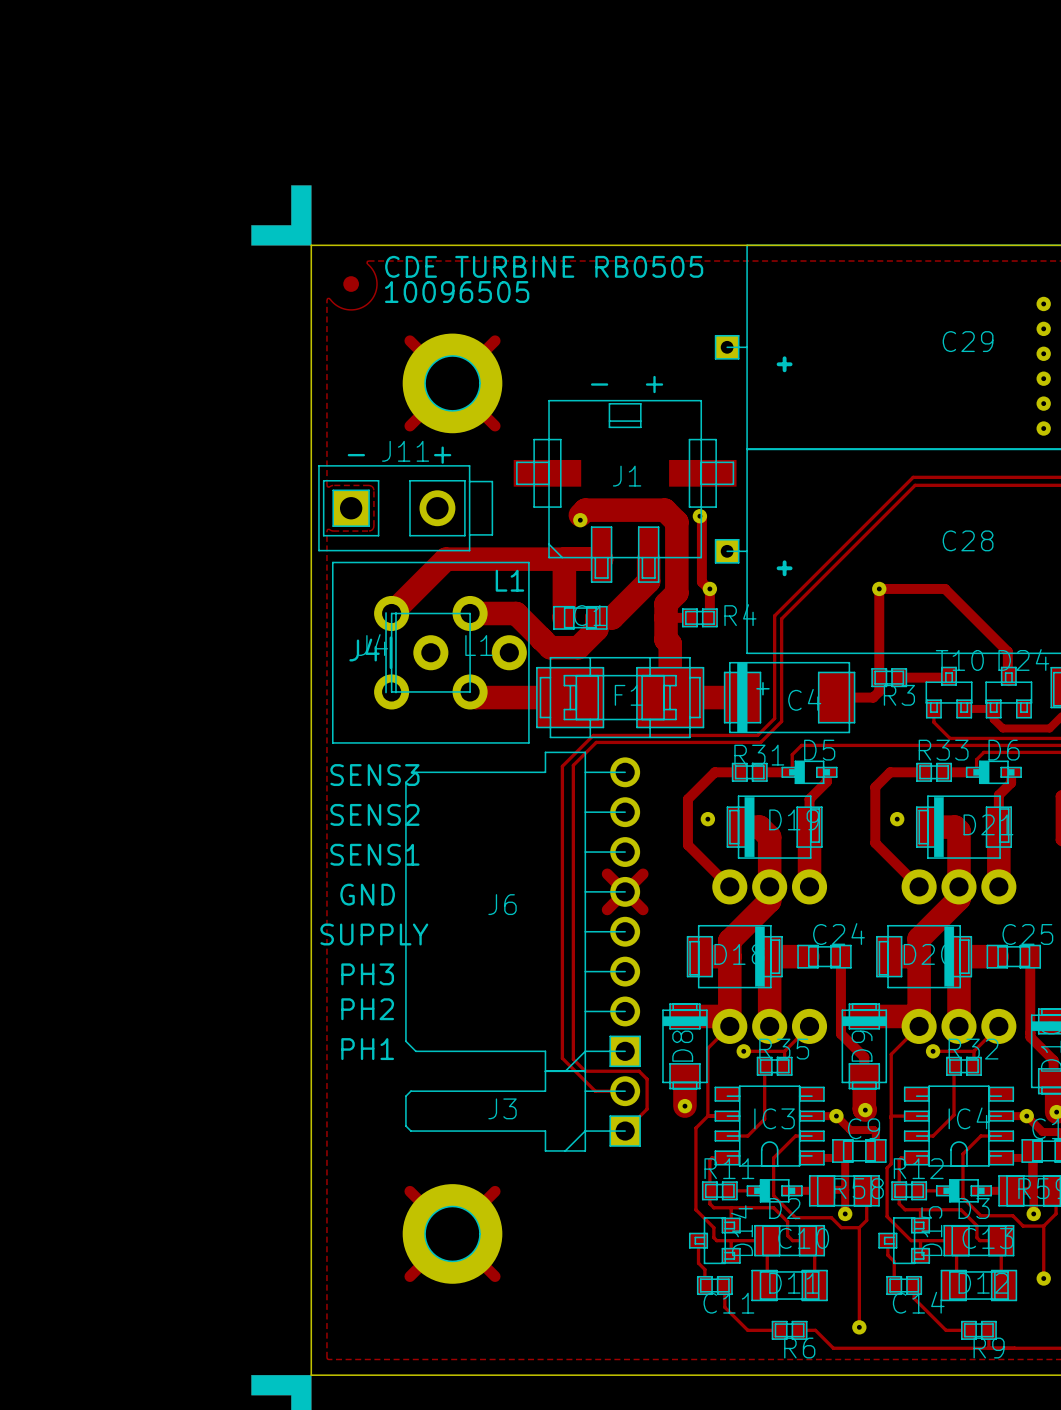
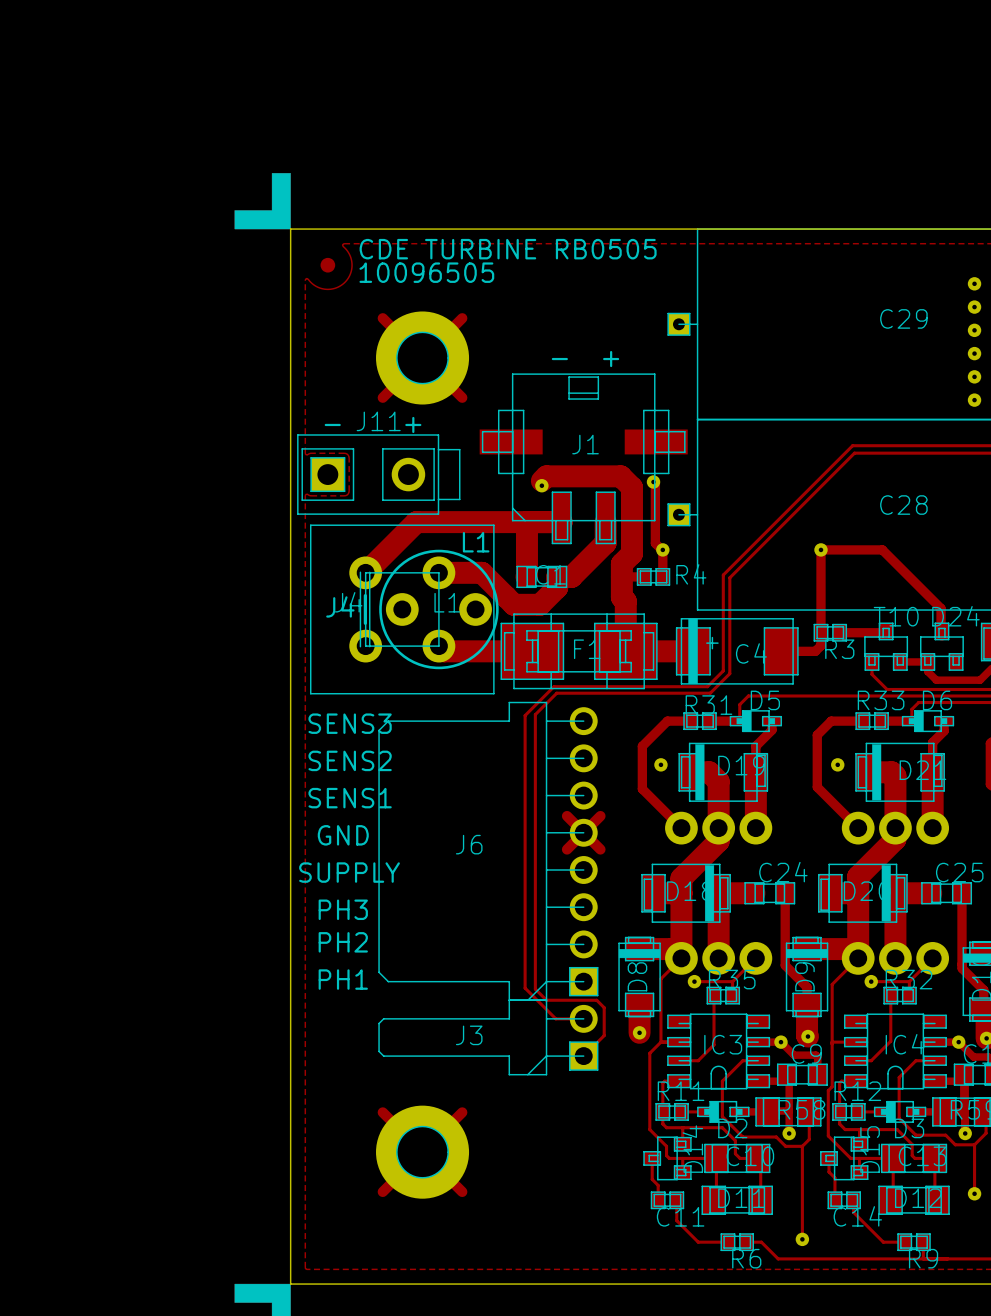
C29 text: + (784, 364) -> none
C28 text: + (784, 568) -> none
drawing: none -> [364, 549, 499, 670]

